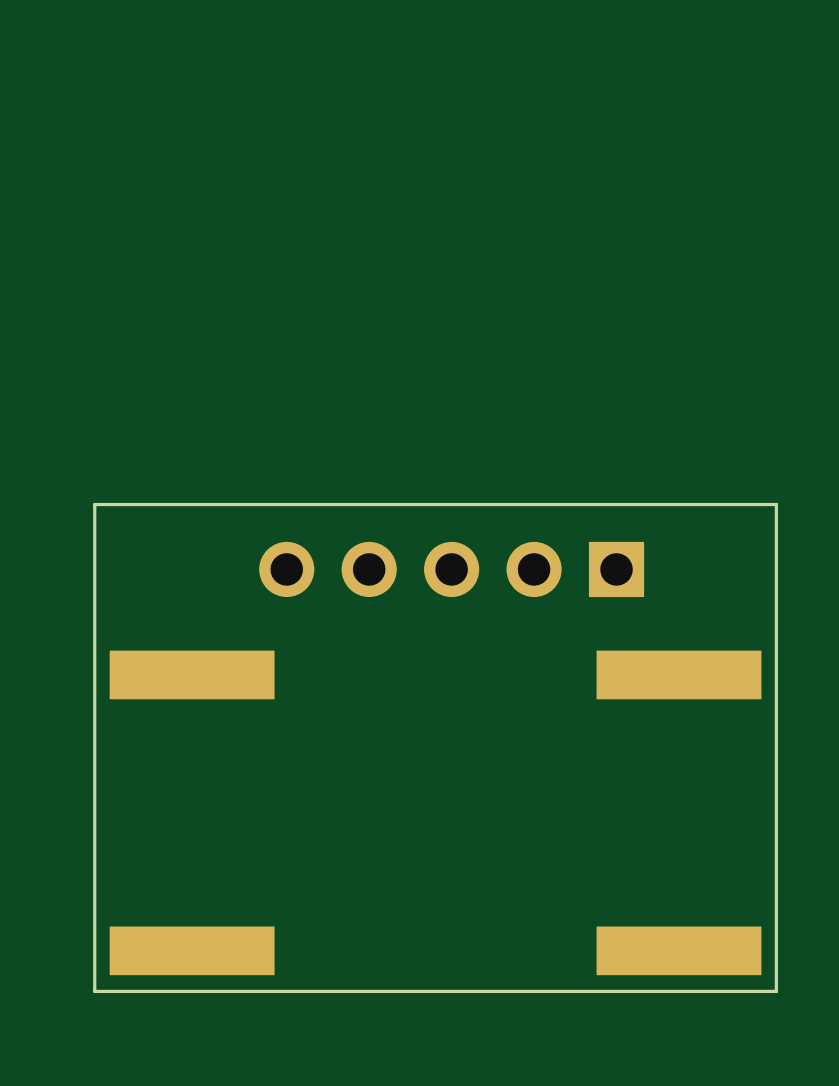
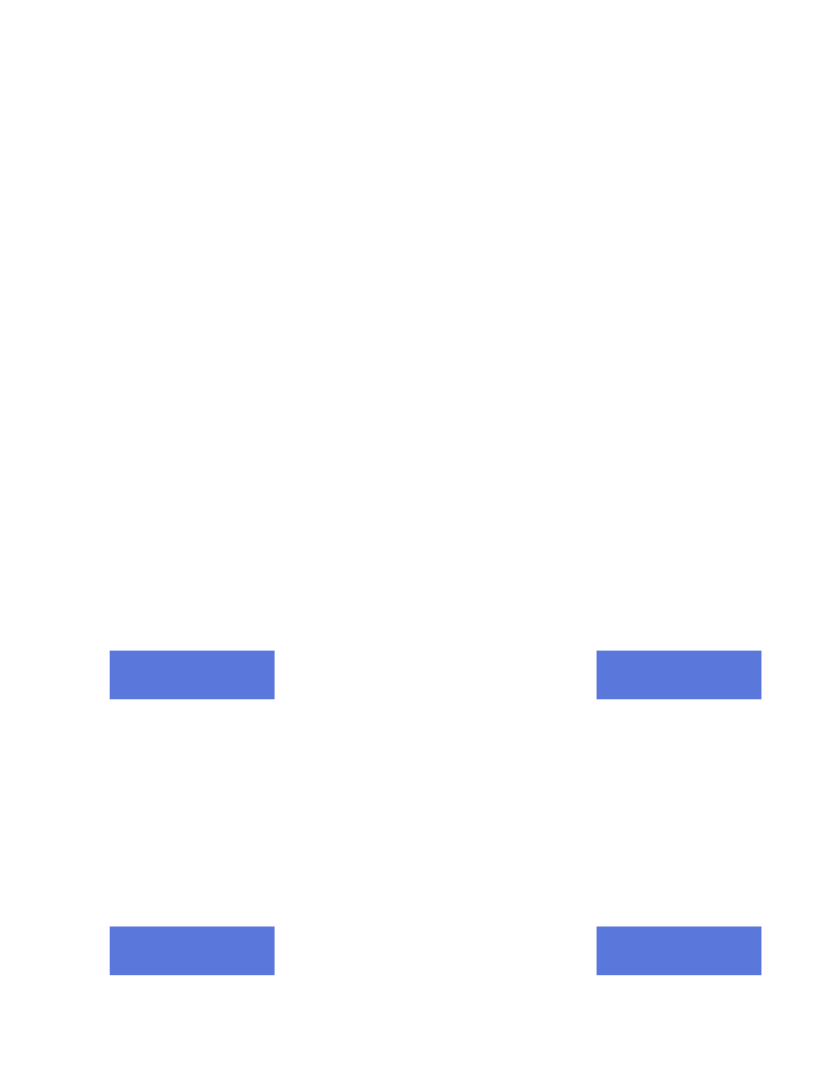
board edge: (776, 504) (94, 504) (94, 991) (776, 991) (776, 504) -> none
part: (451, 569) -> none

